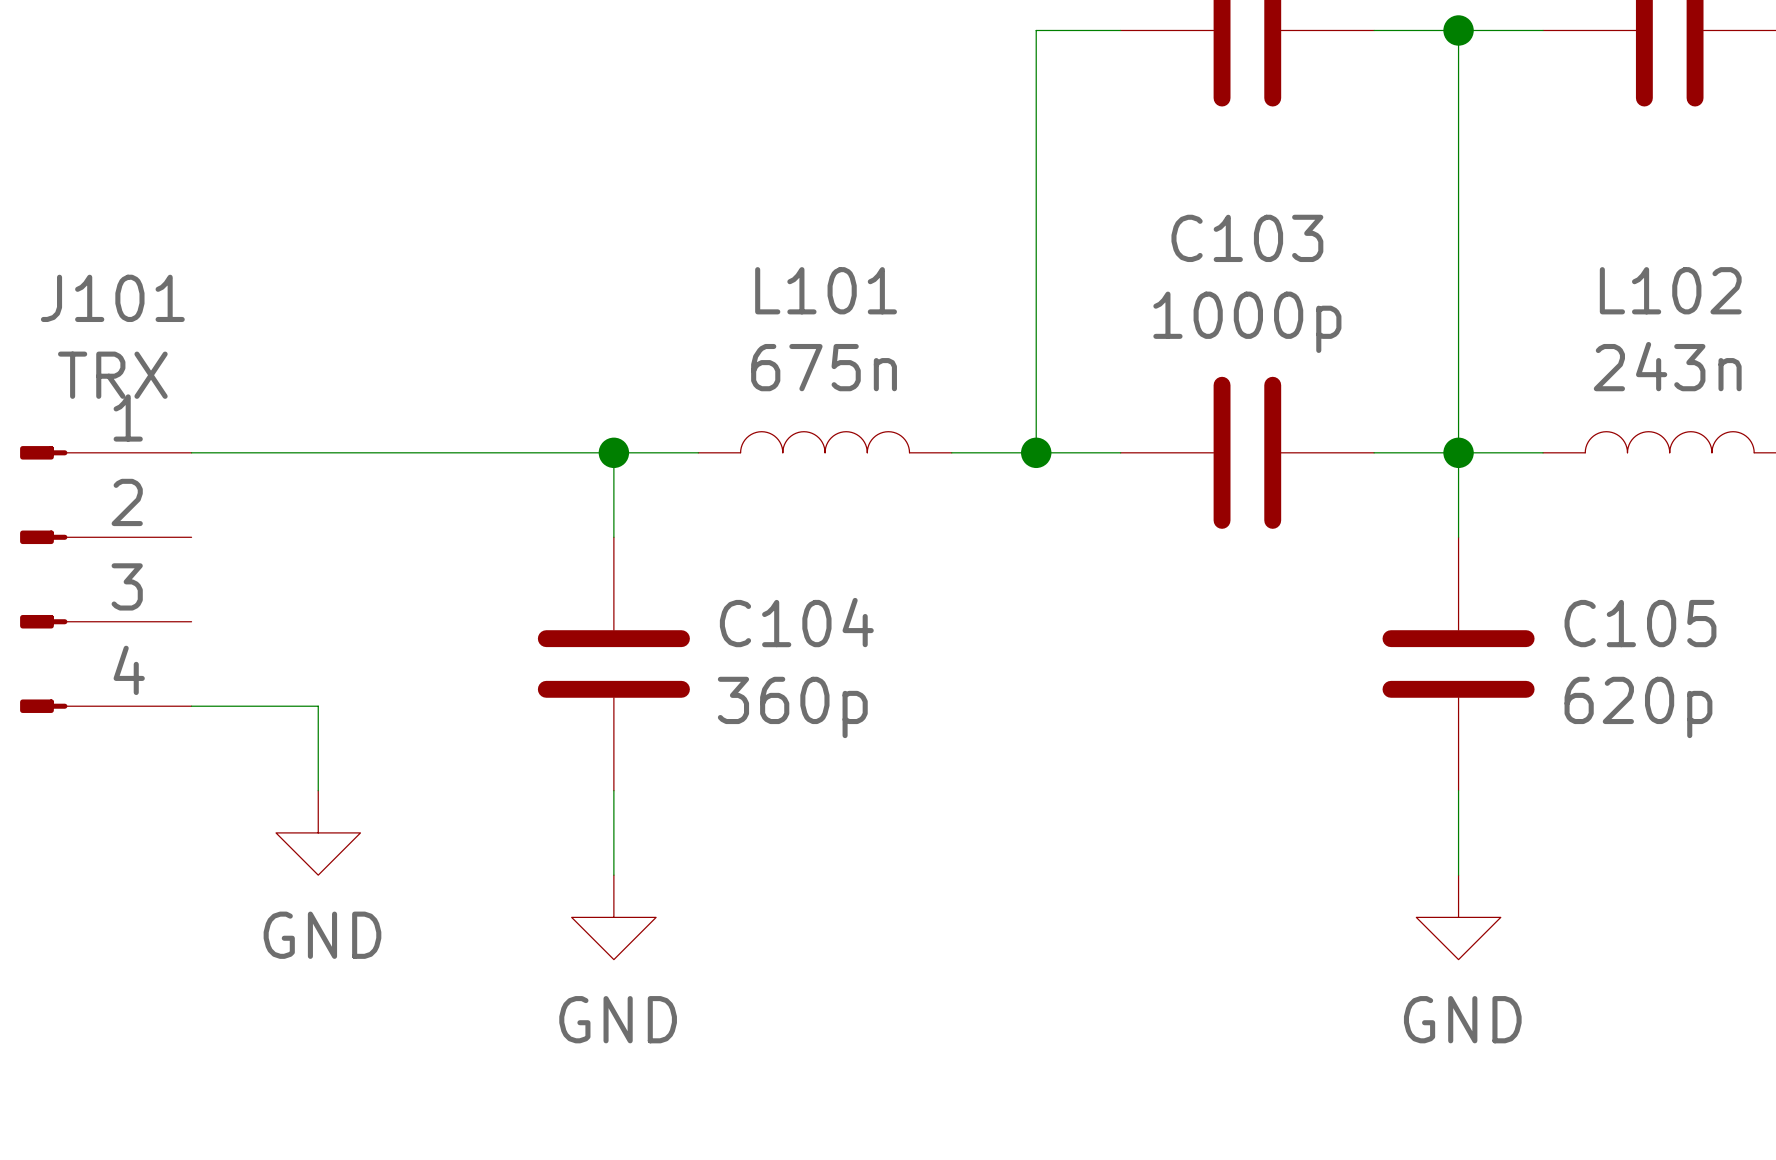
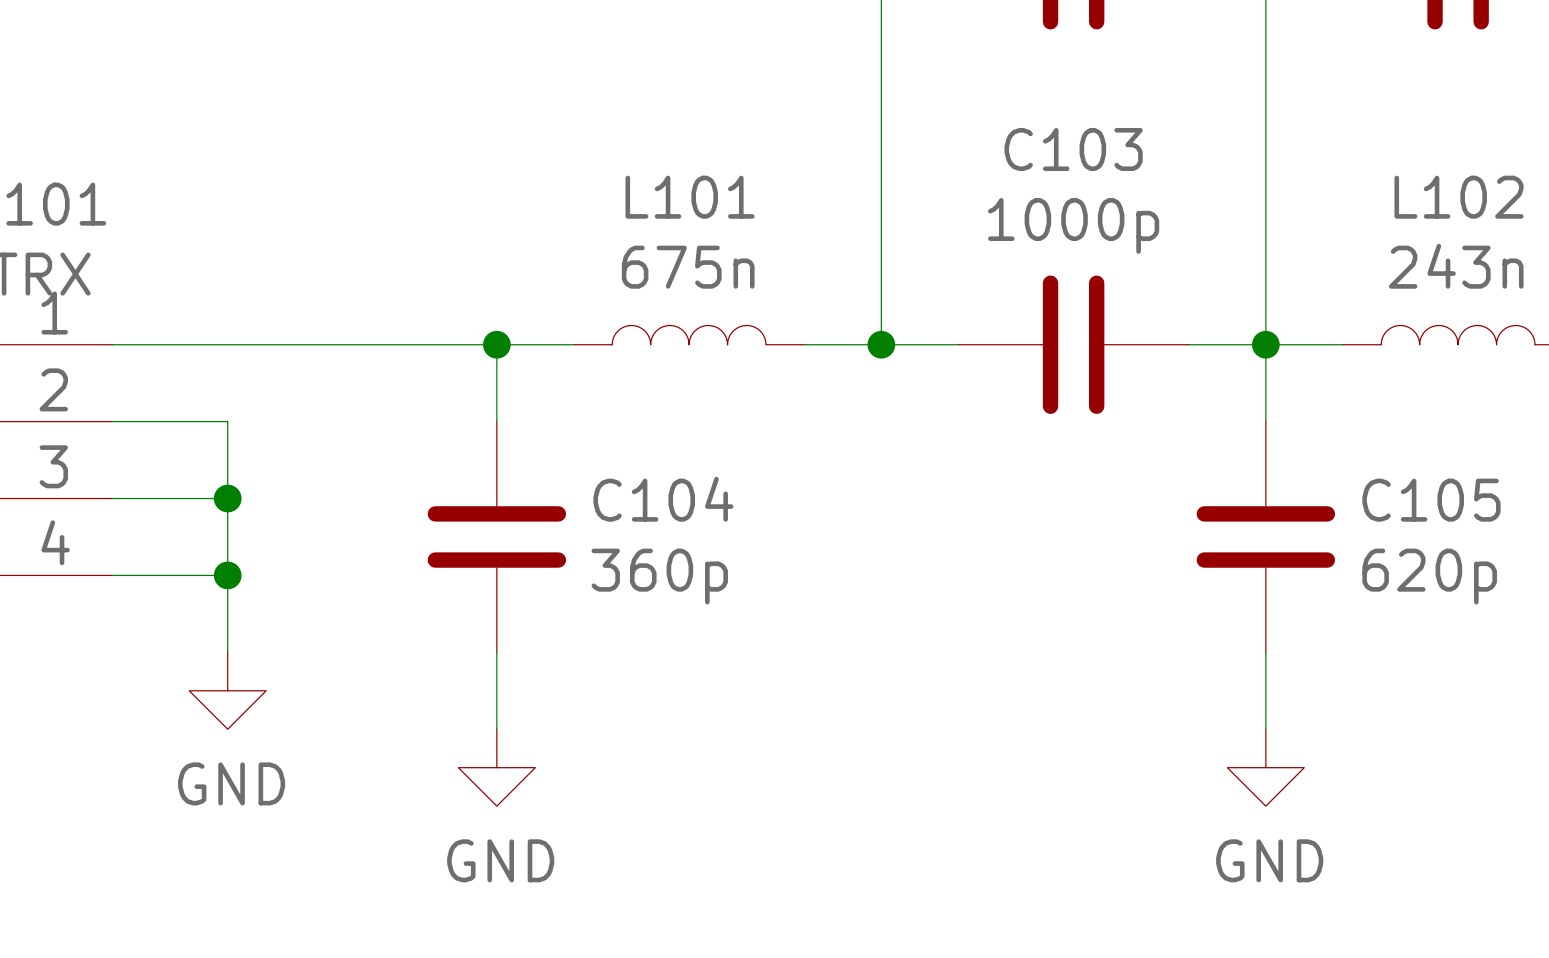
wire: none -> (112, 421) (227, 421) (227, 575)
wire: none -> (112, 498) (227, 498)
junction: none -> (227, 498)
junction: none -> (227, 575)

